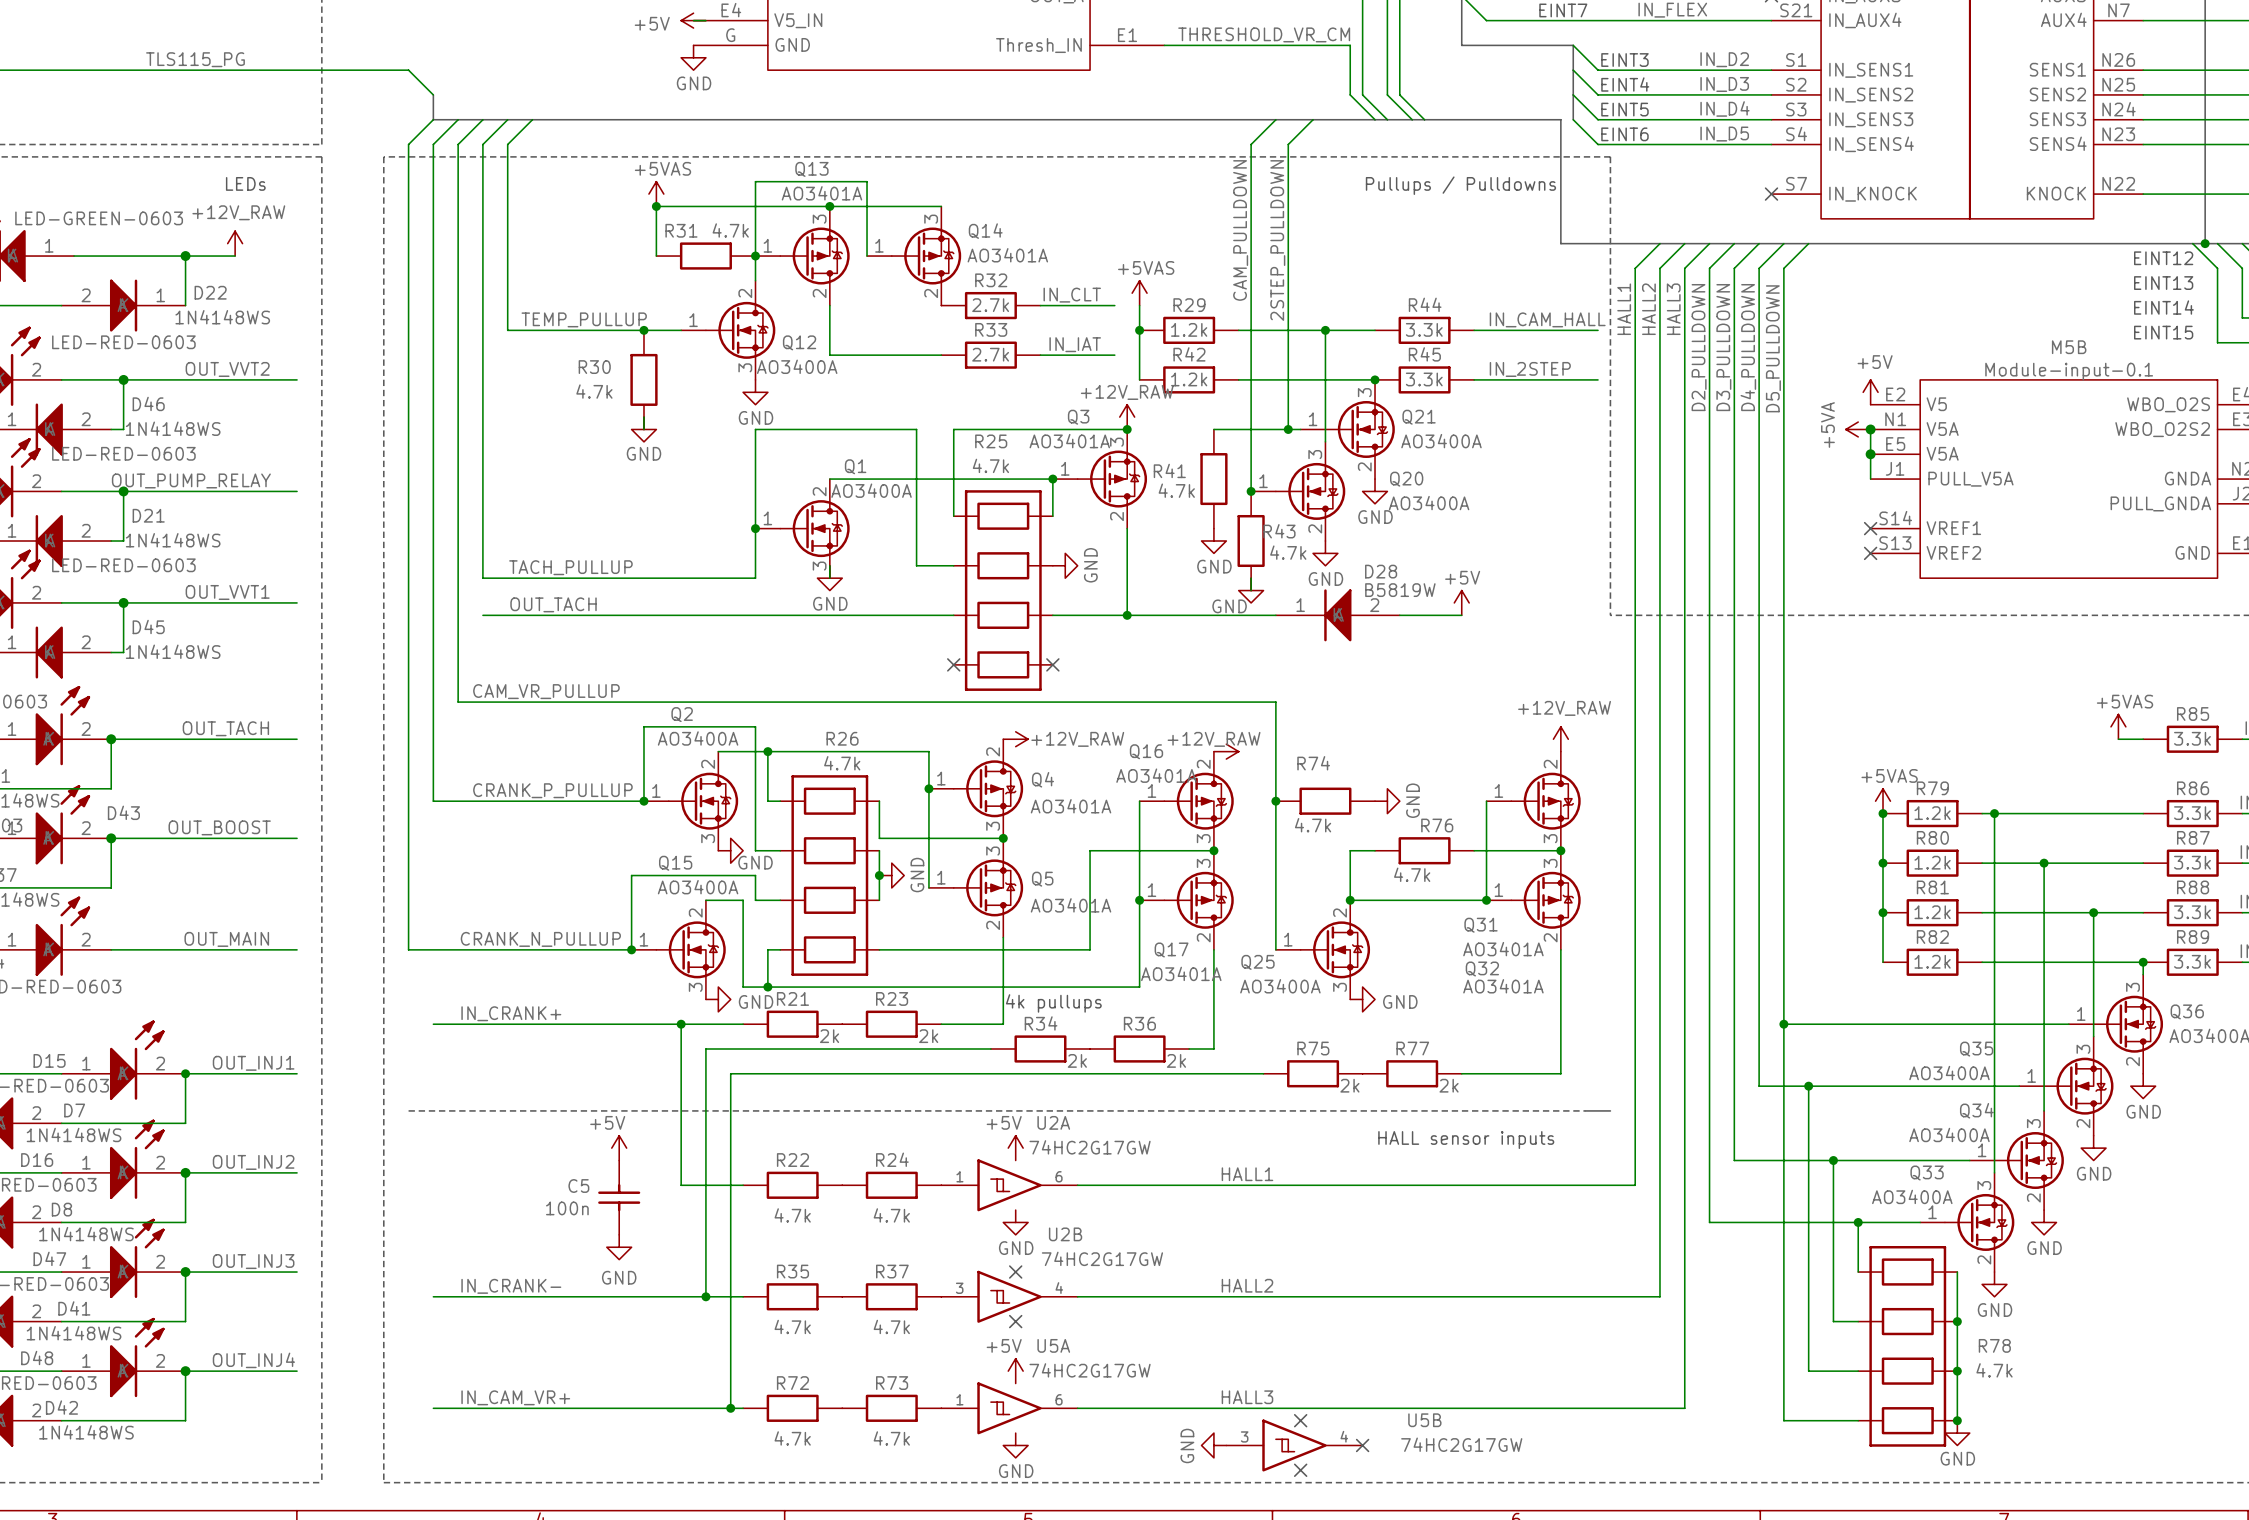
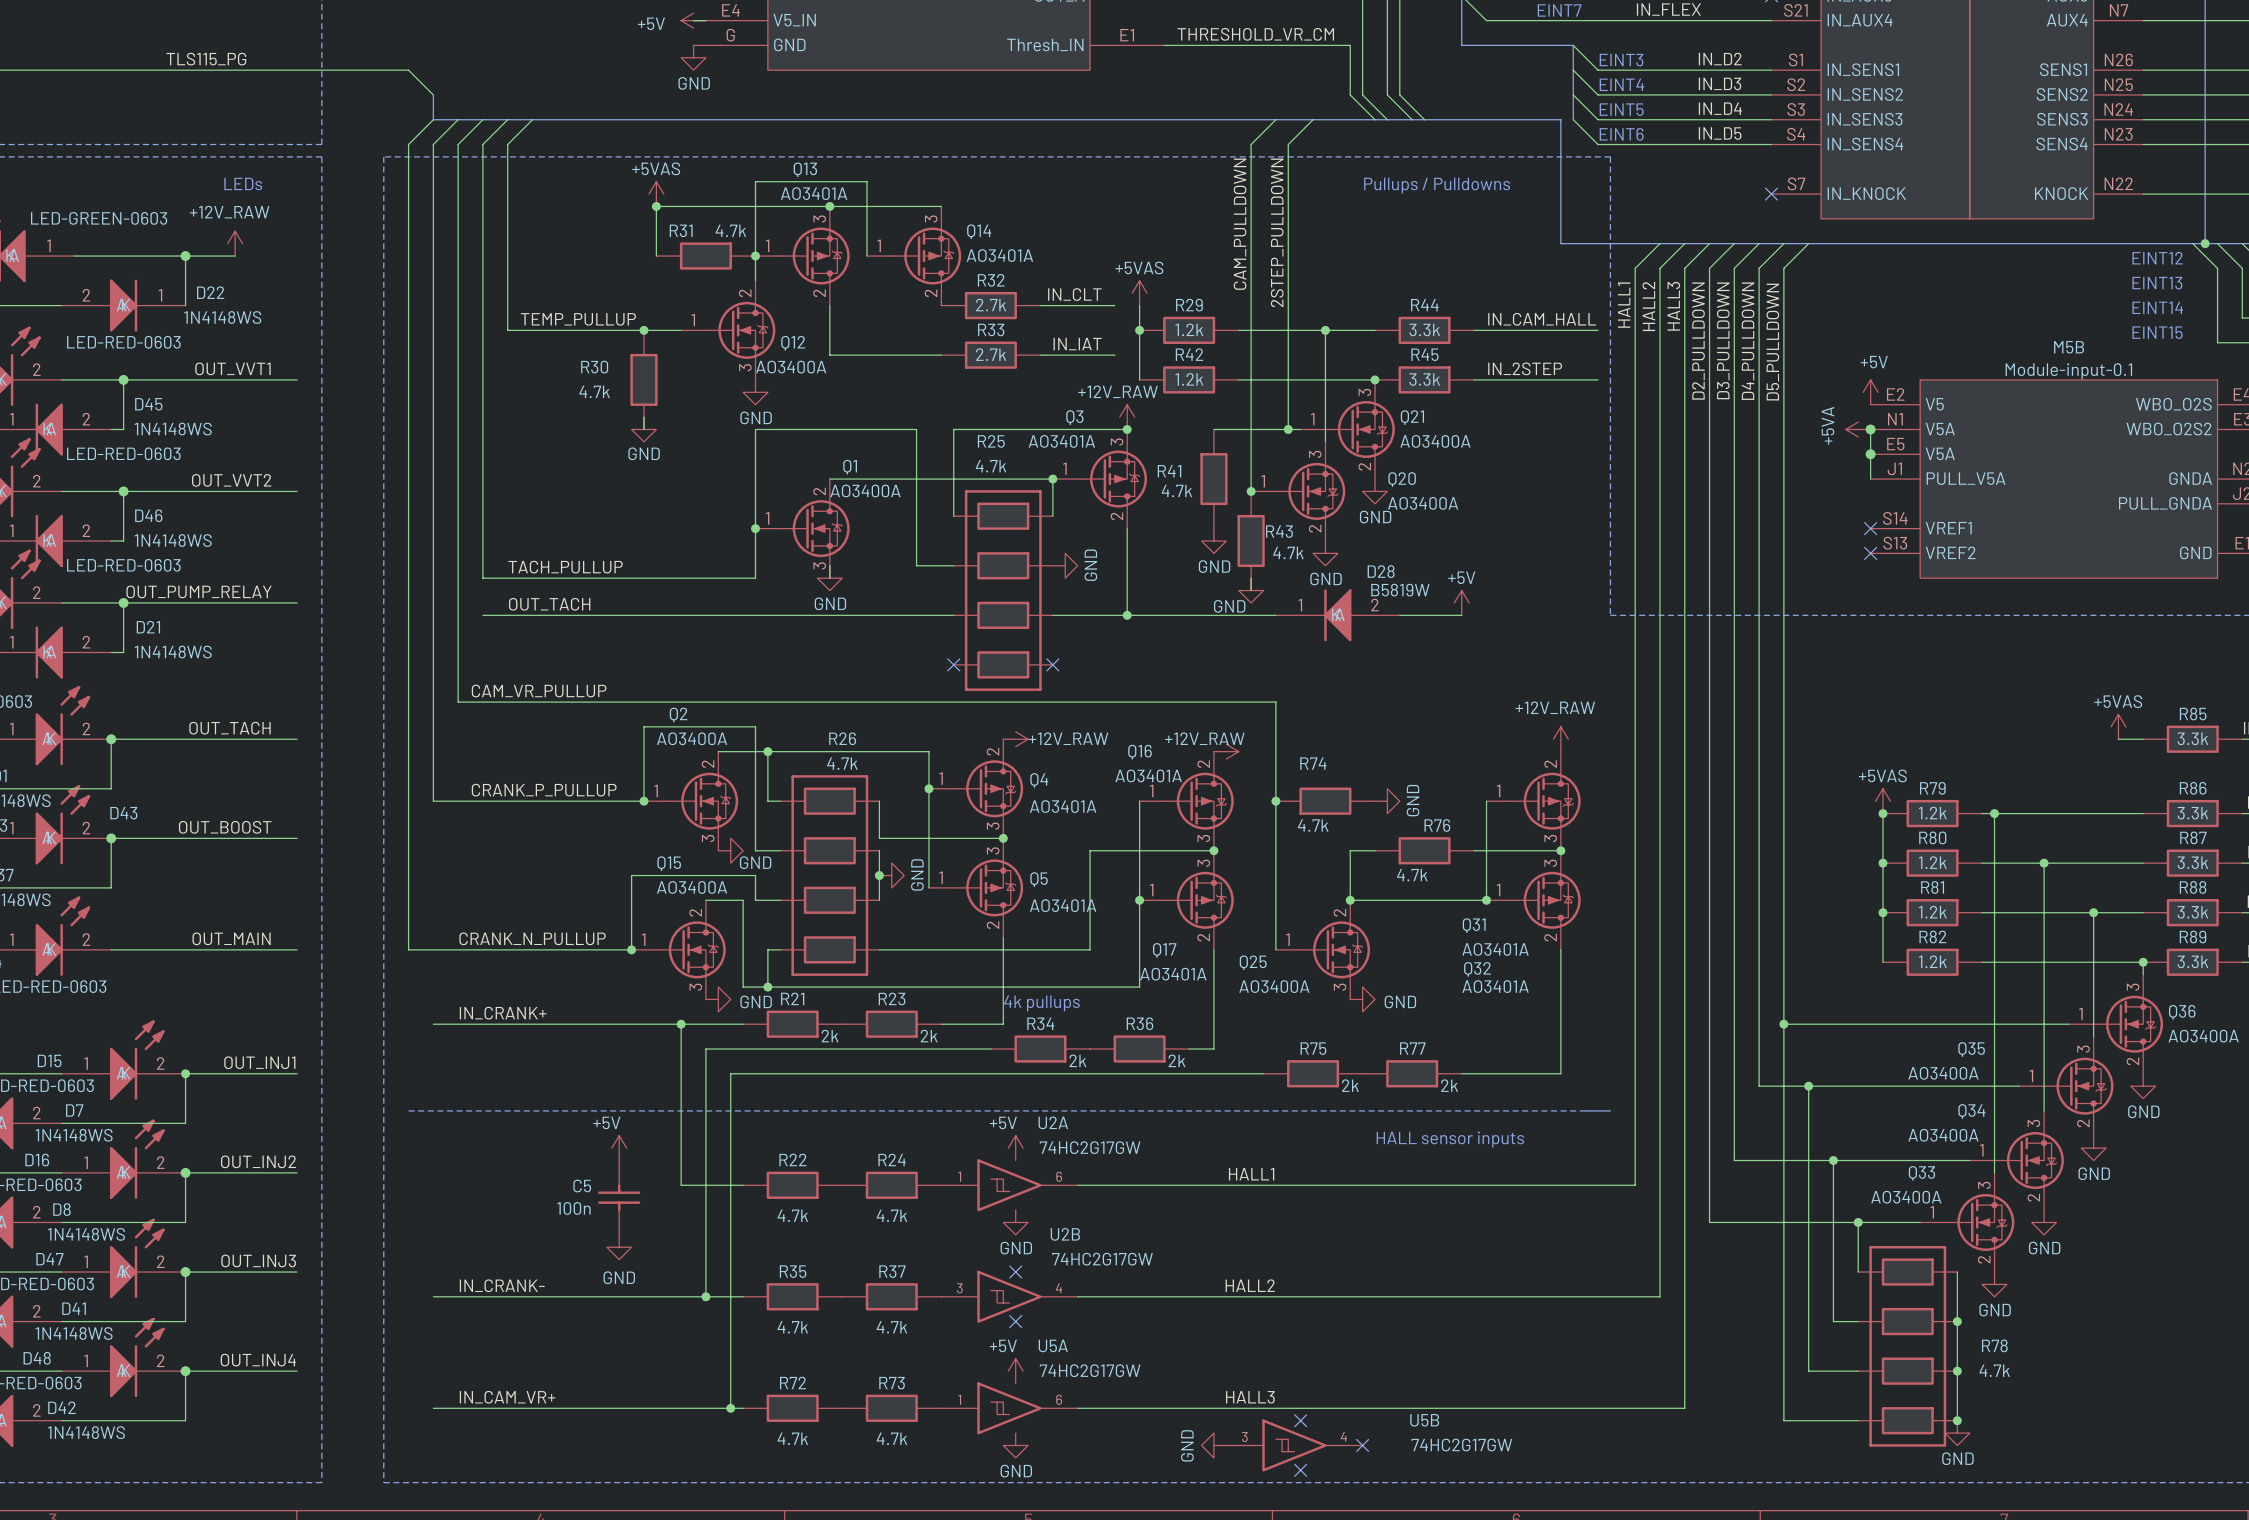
label: OUT_VVT2 (227, 369) -> OUT_VVT1 (232, 368)
D46 name: D46 (148, 403) -> D45 (148, 404)
label: OUT_PUMP_RELAY (191, 480) -> OUT_VVT2 (231, 480)
D21 name: D21 (148, 515) -> D46 (148, 515)
label: OUT_VVT1 (227, 592) -> OUT_PUMP_RELAY (199, 591)
D45 name: D45 (148, 626) -> D21 (148, 627)

